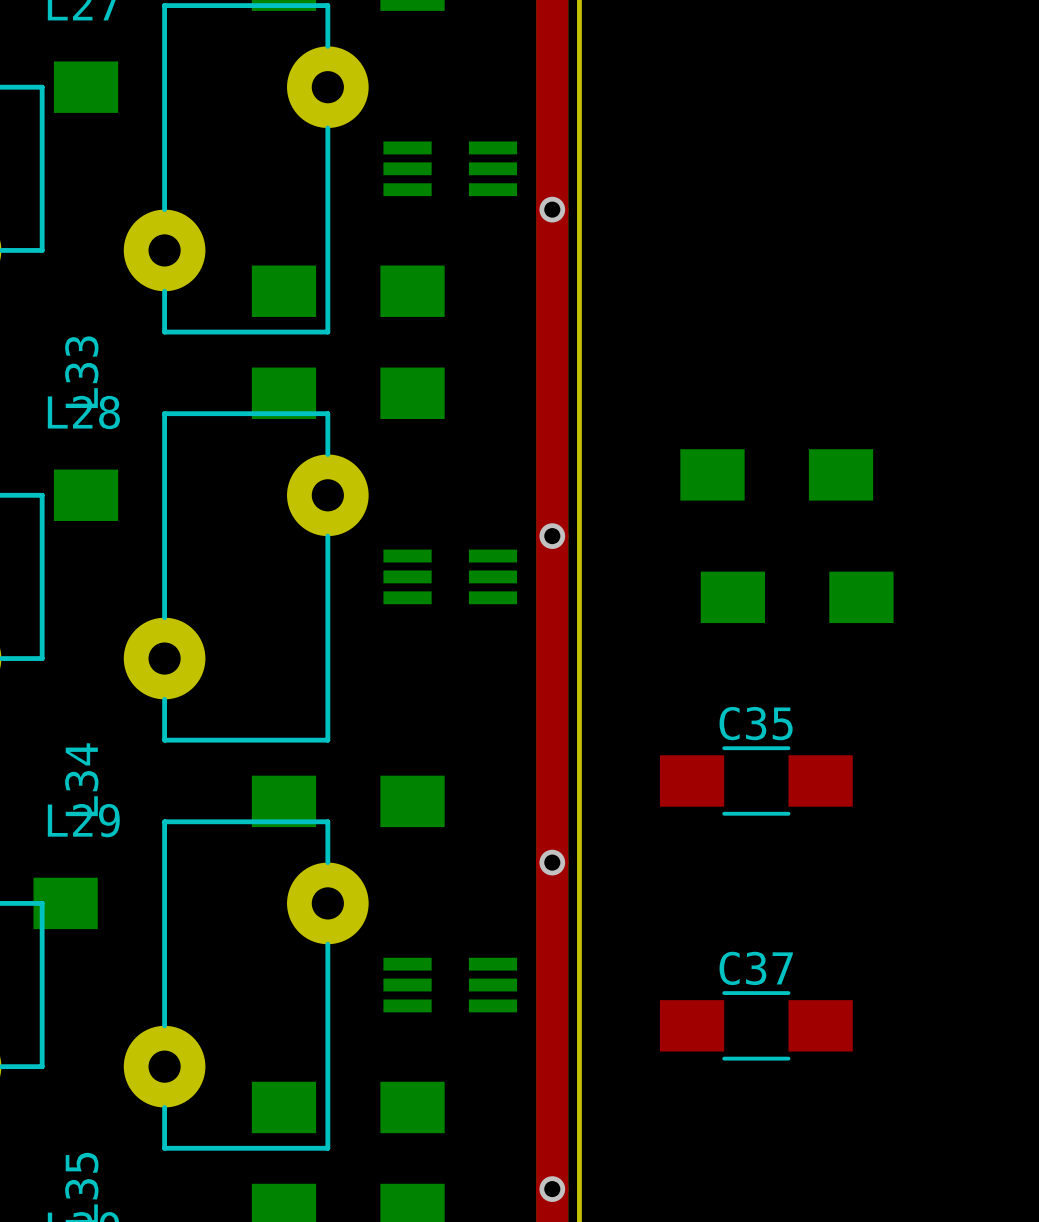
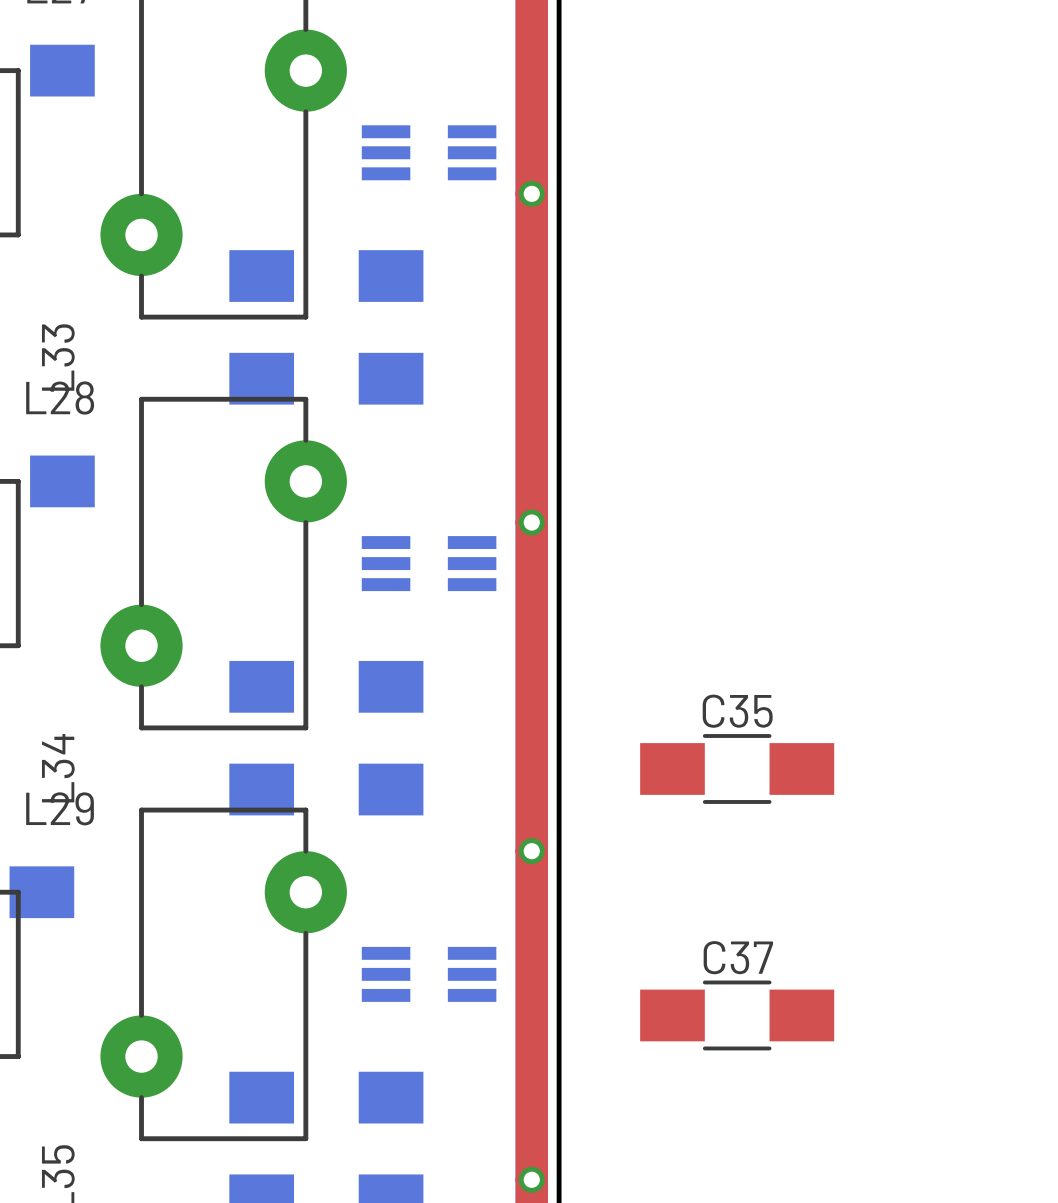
part: (776, 474) -> none
part: (797, 597) -> none
part: none -> (326, 686)

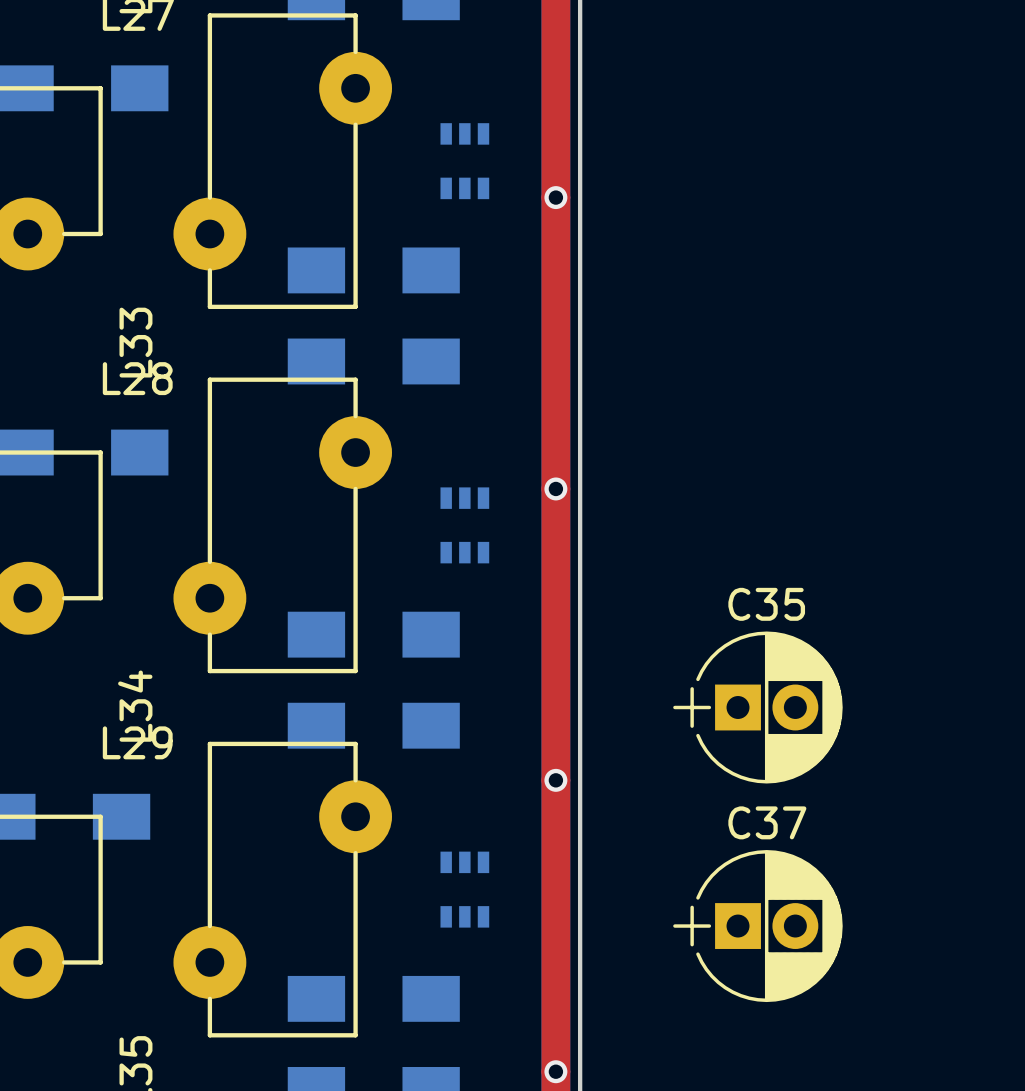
part footprint: [361, 125, 497, 181] -> [440, 123, 490, 200]
part footprint: [361, 536, 497, 592] -> [440, 487, 490, 564]
C35 footprint: [640, 734, 835, 804] -> [673, 631, 843, 784]
part footprint: [361, 946, 497, 1002] -> [440, 851, 490, 928]
C37 footprint: [640, 980, 835, 1051] -> [673, 850, 843, 1003]

